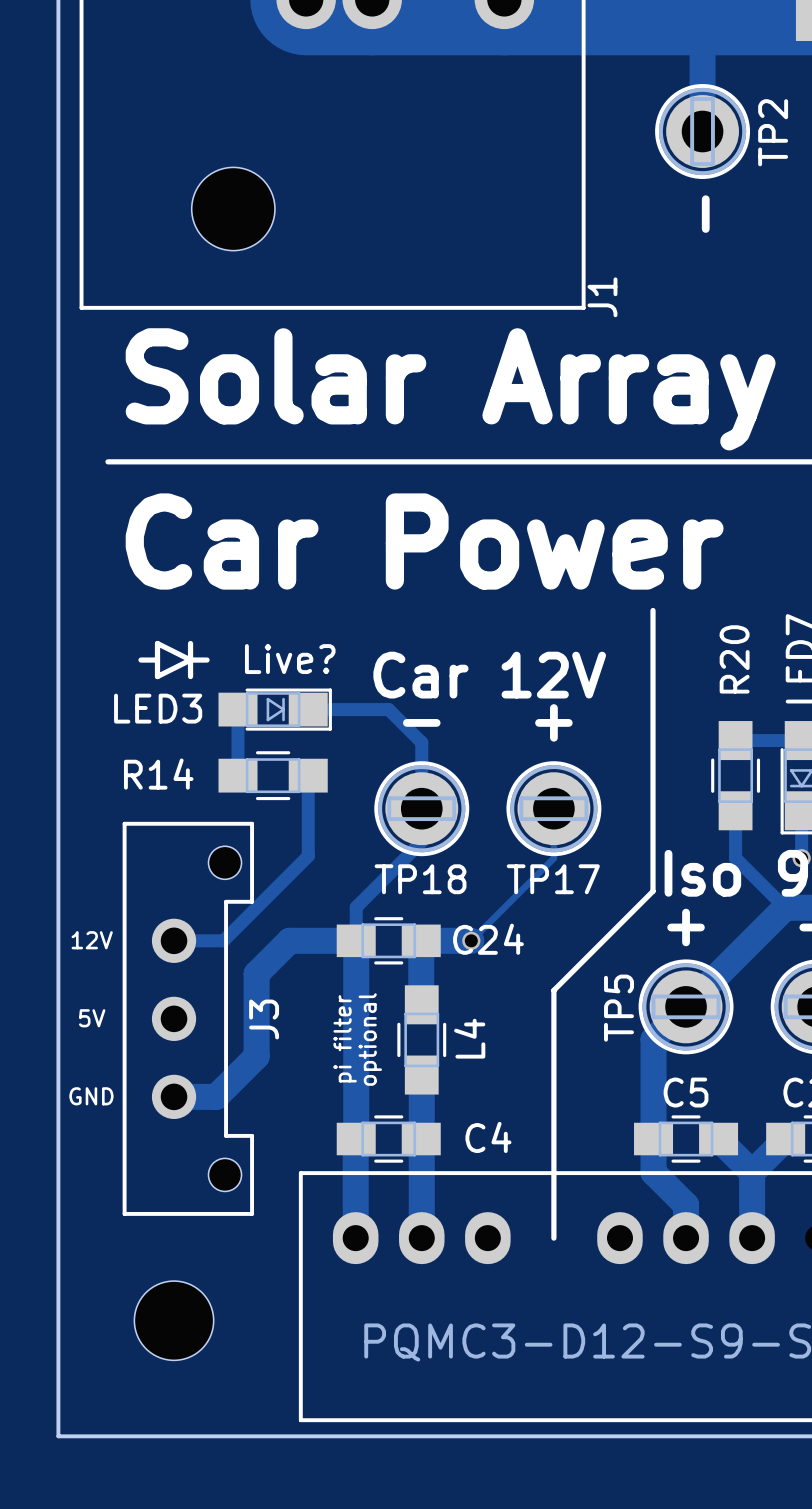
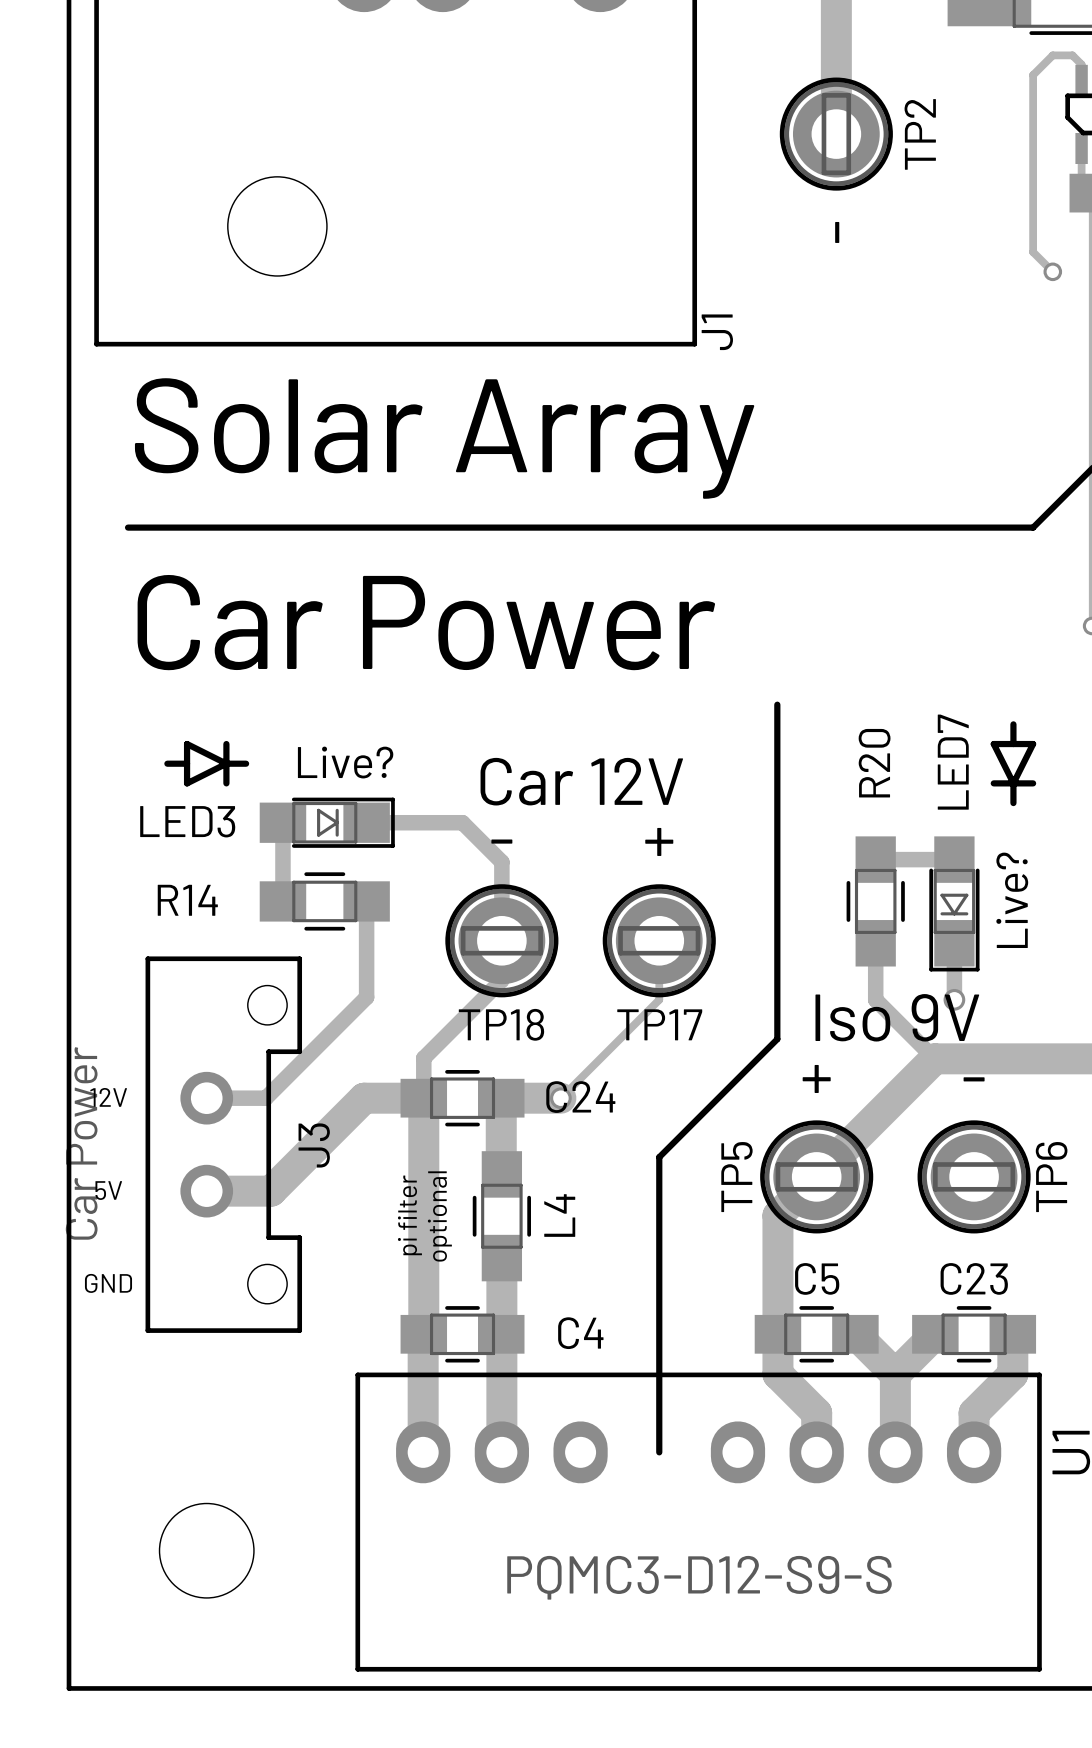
J3 footprint: [122, 821, 255, 1216] -> [145, 956, 303, 1333]
track: (306, 940) (289, 940) (256, 973) (256, 1056) (216, 1096) (174, 1096) -> (364, 1098) (271, 1191) (206, 1191)
J3 value: none -> Car Power (81, 1143)

